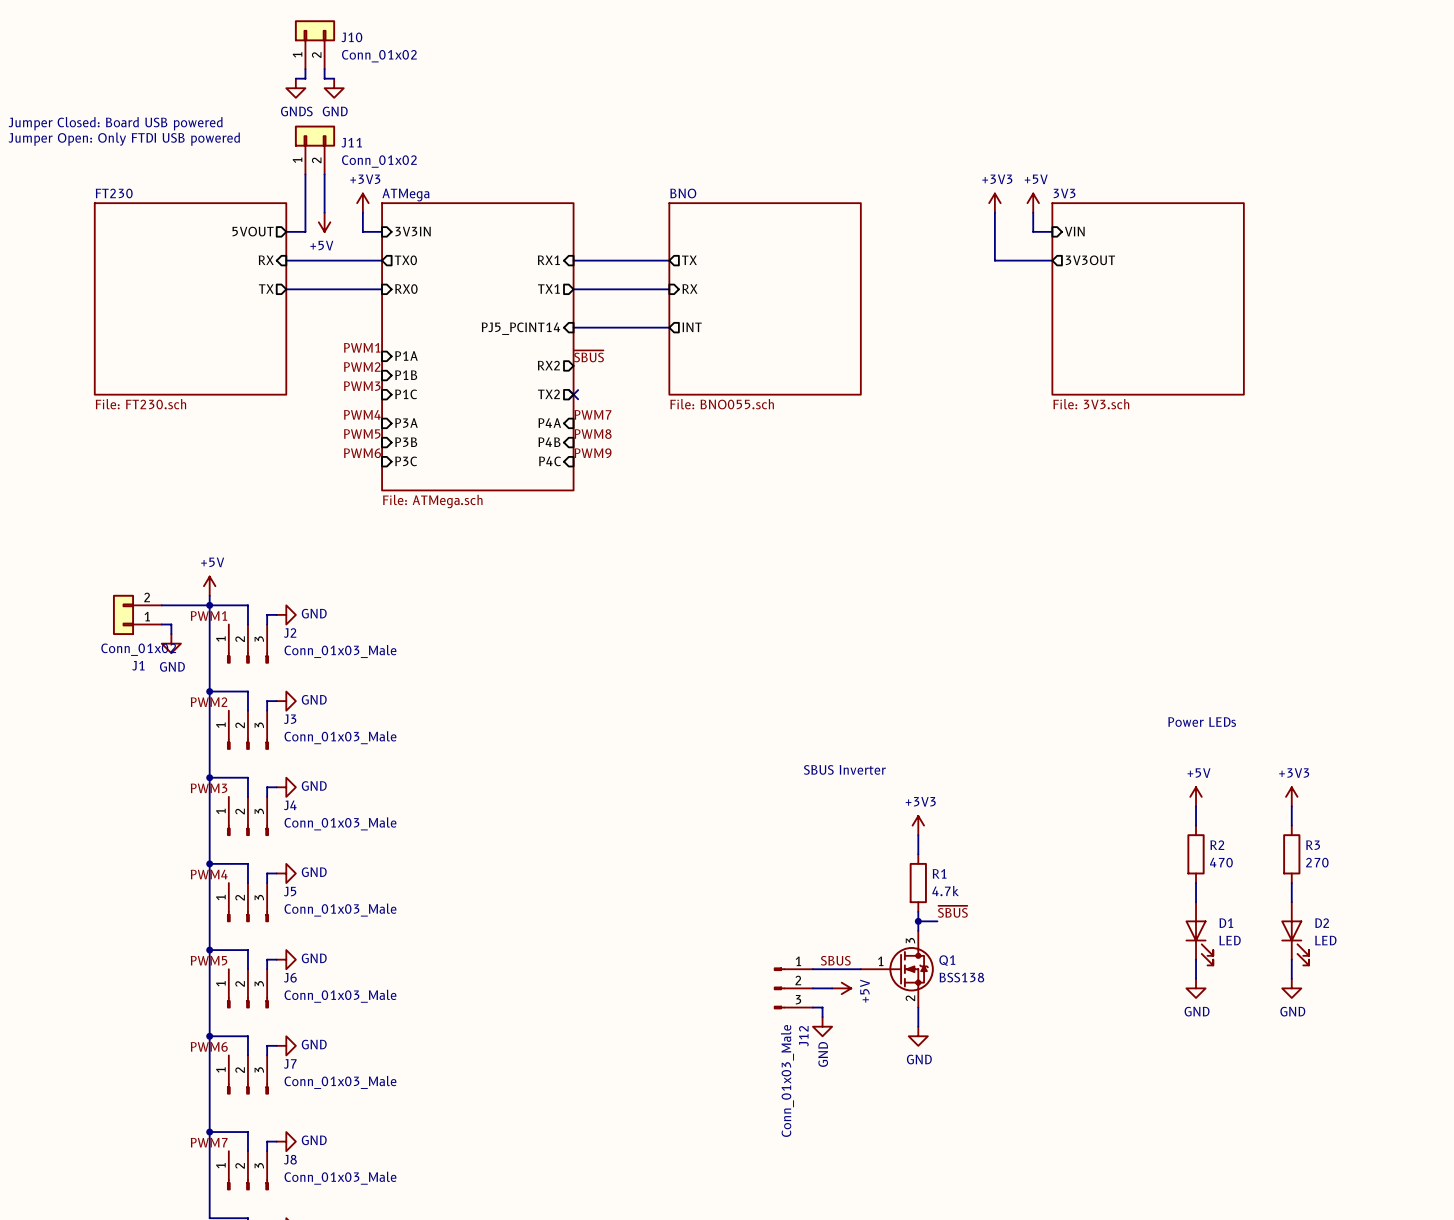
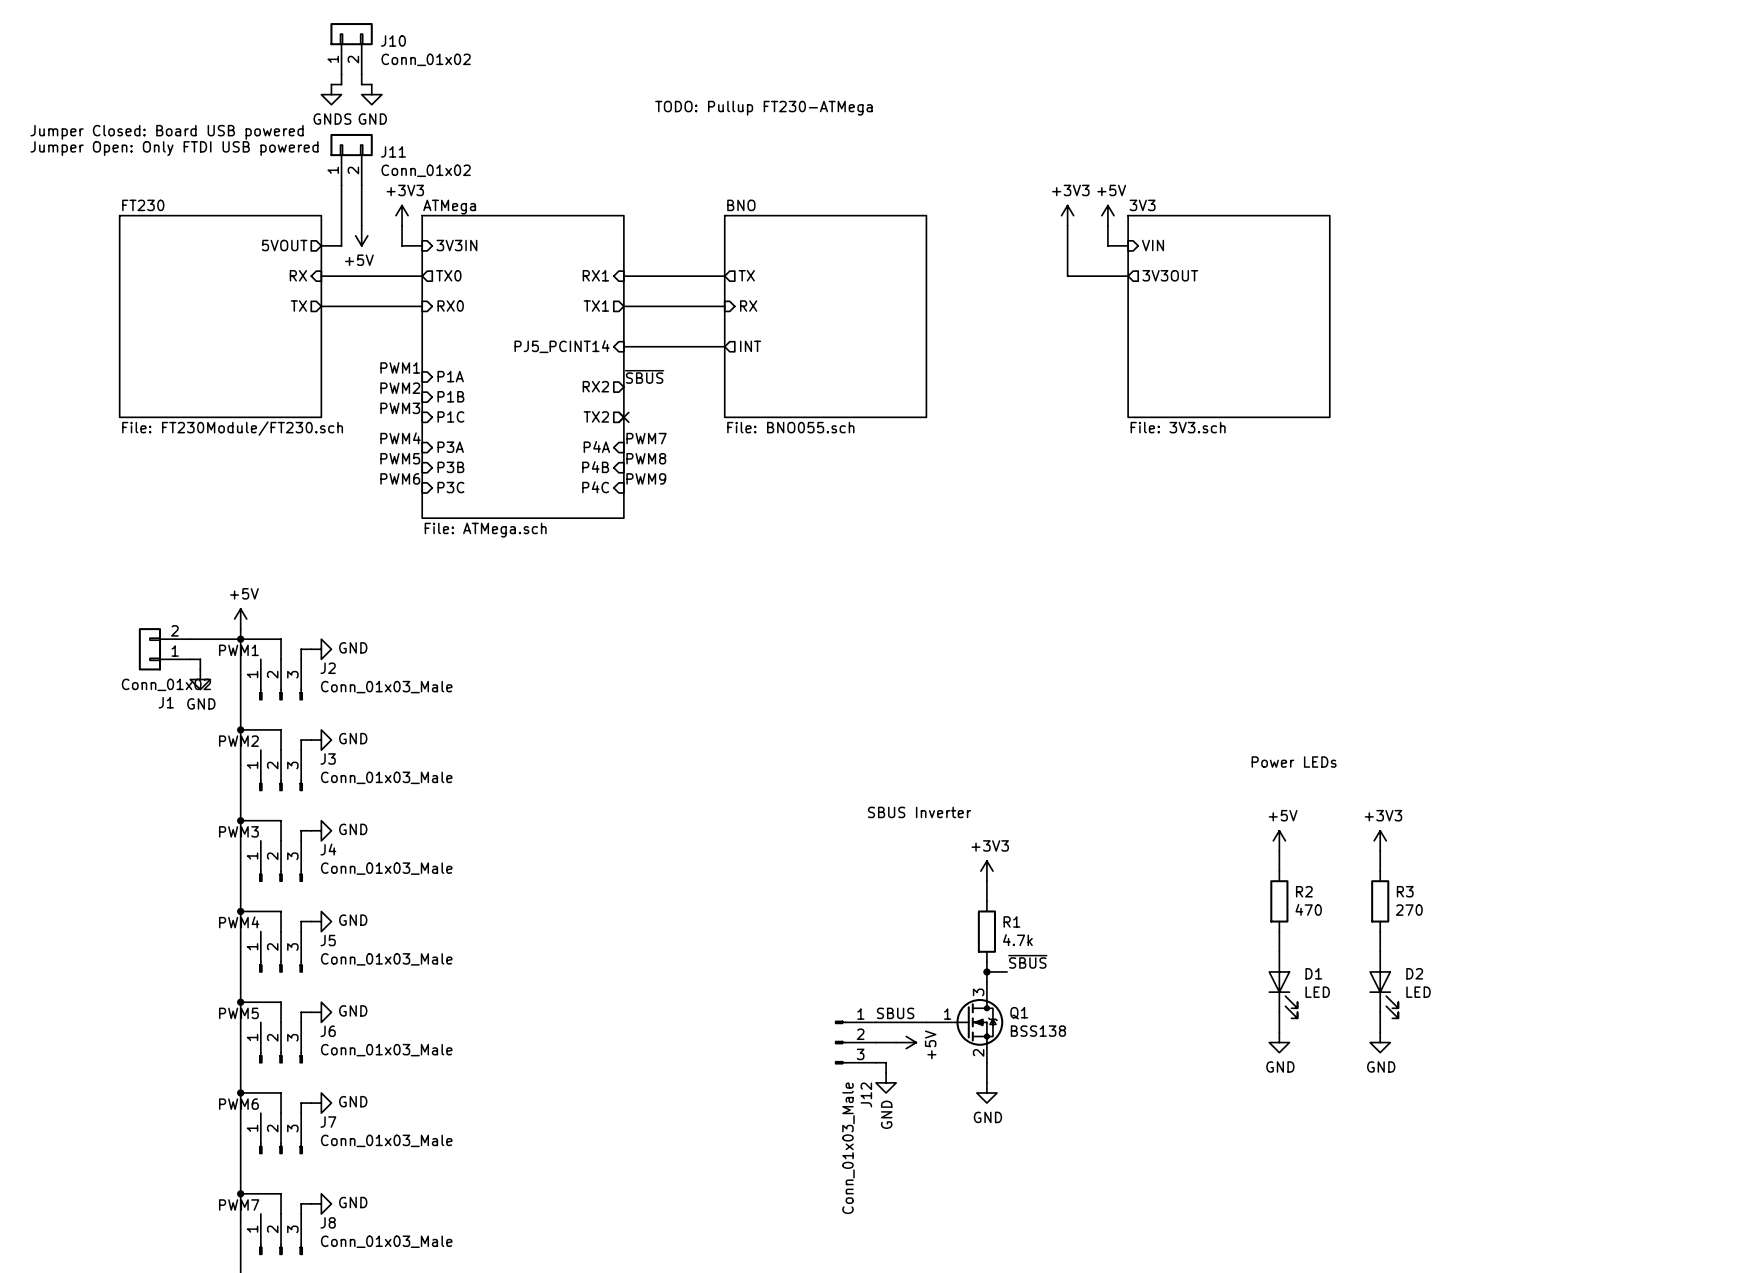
text: none -> TODO: Pullup FT230-ATMega (763, 108)
sheet FT230 value: File: FT230.sch (140, 404) -> File: FT230Module/FT230.sch (232, 428)

